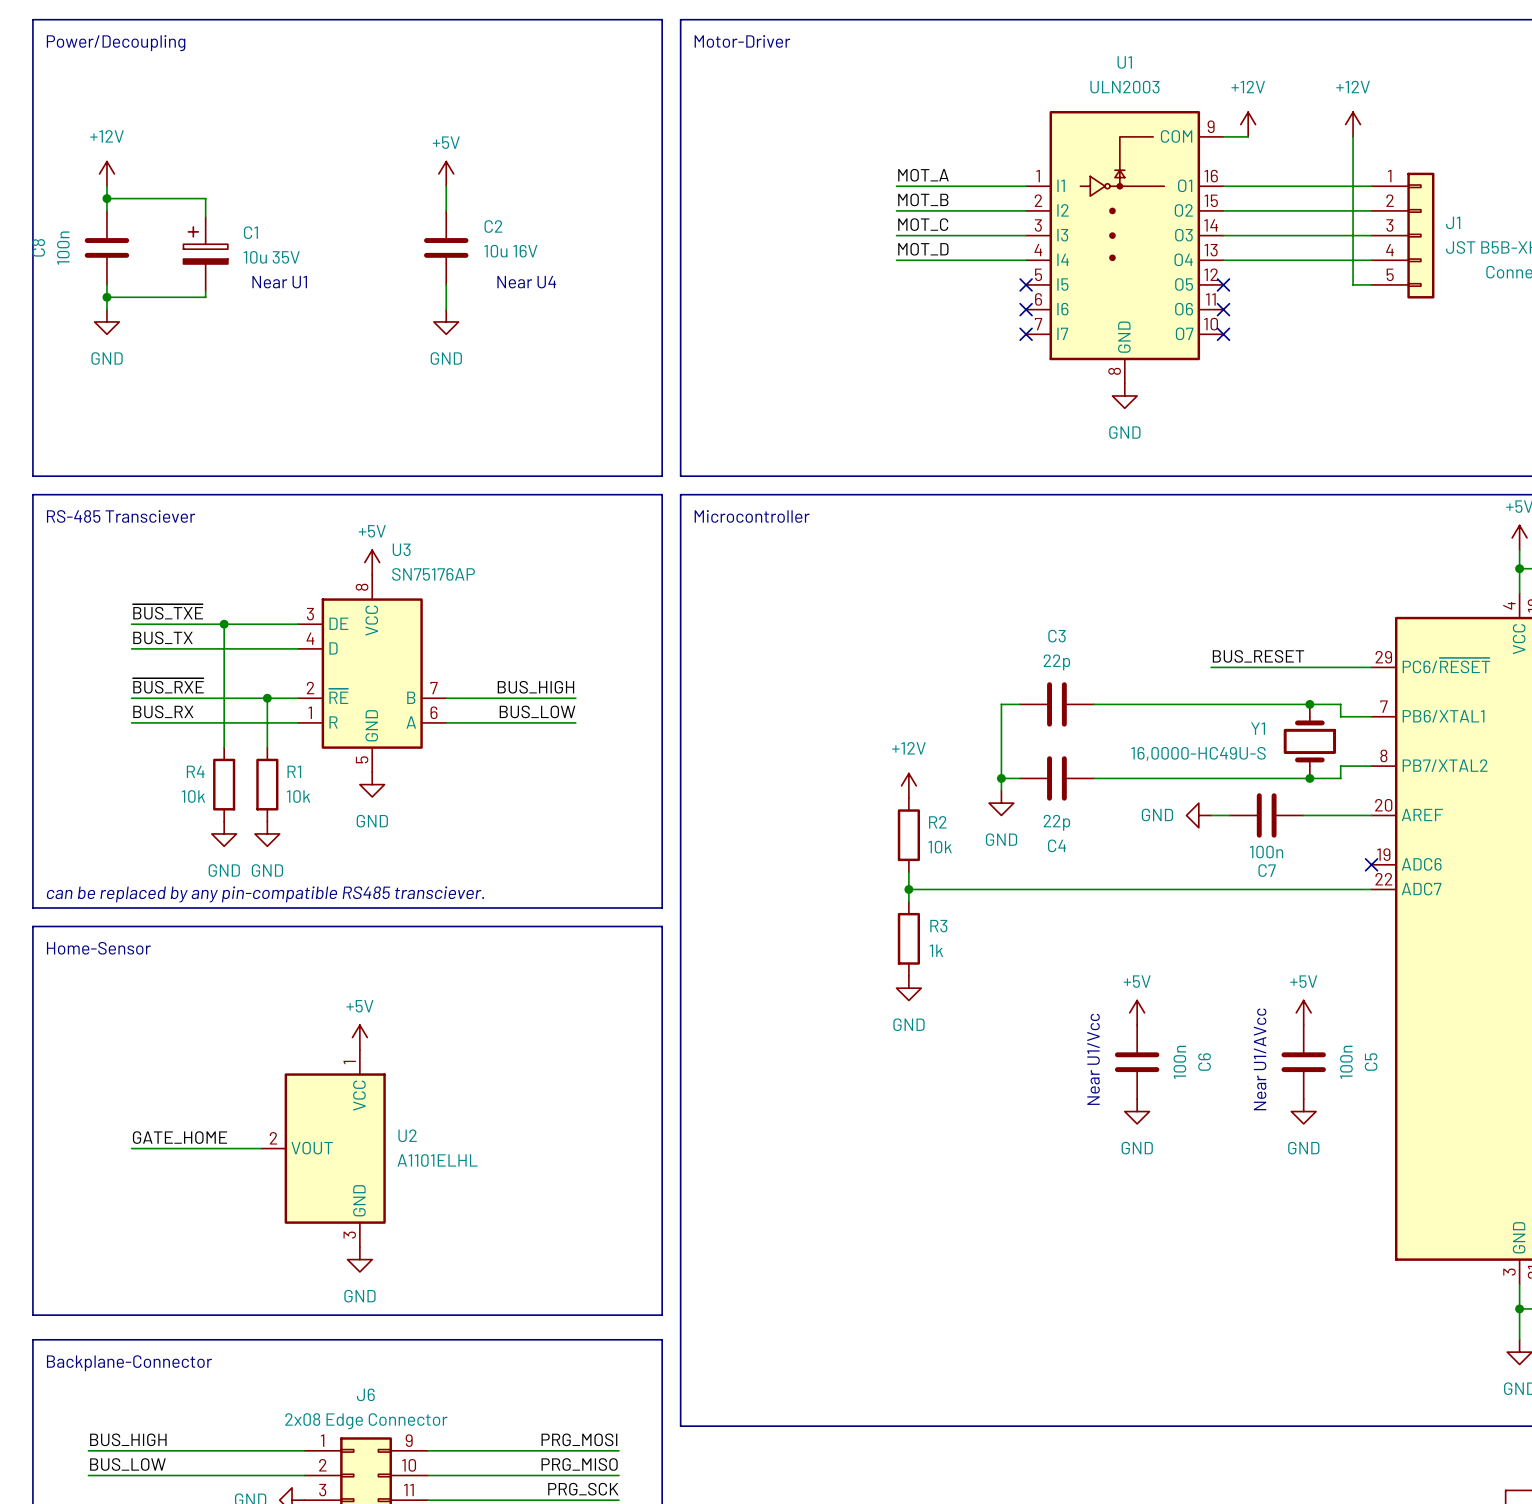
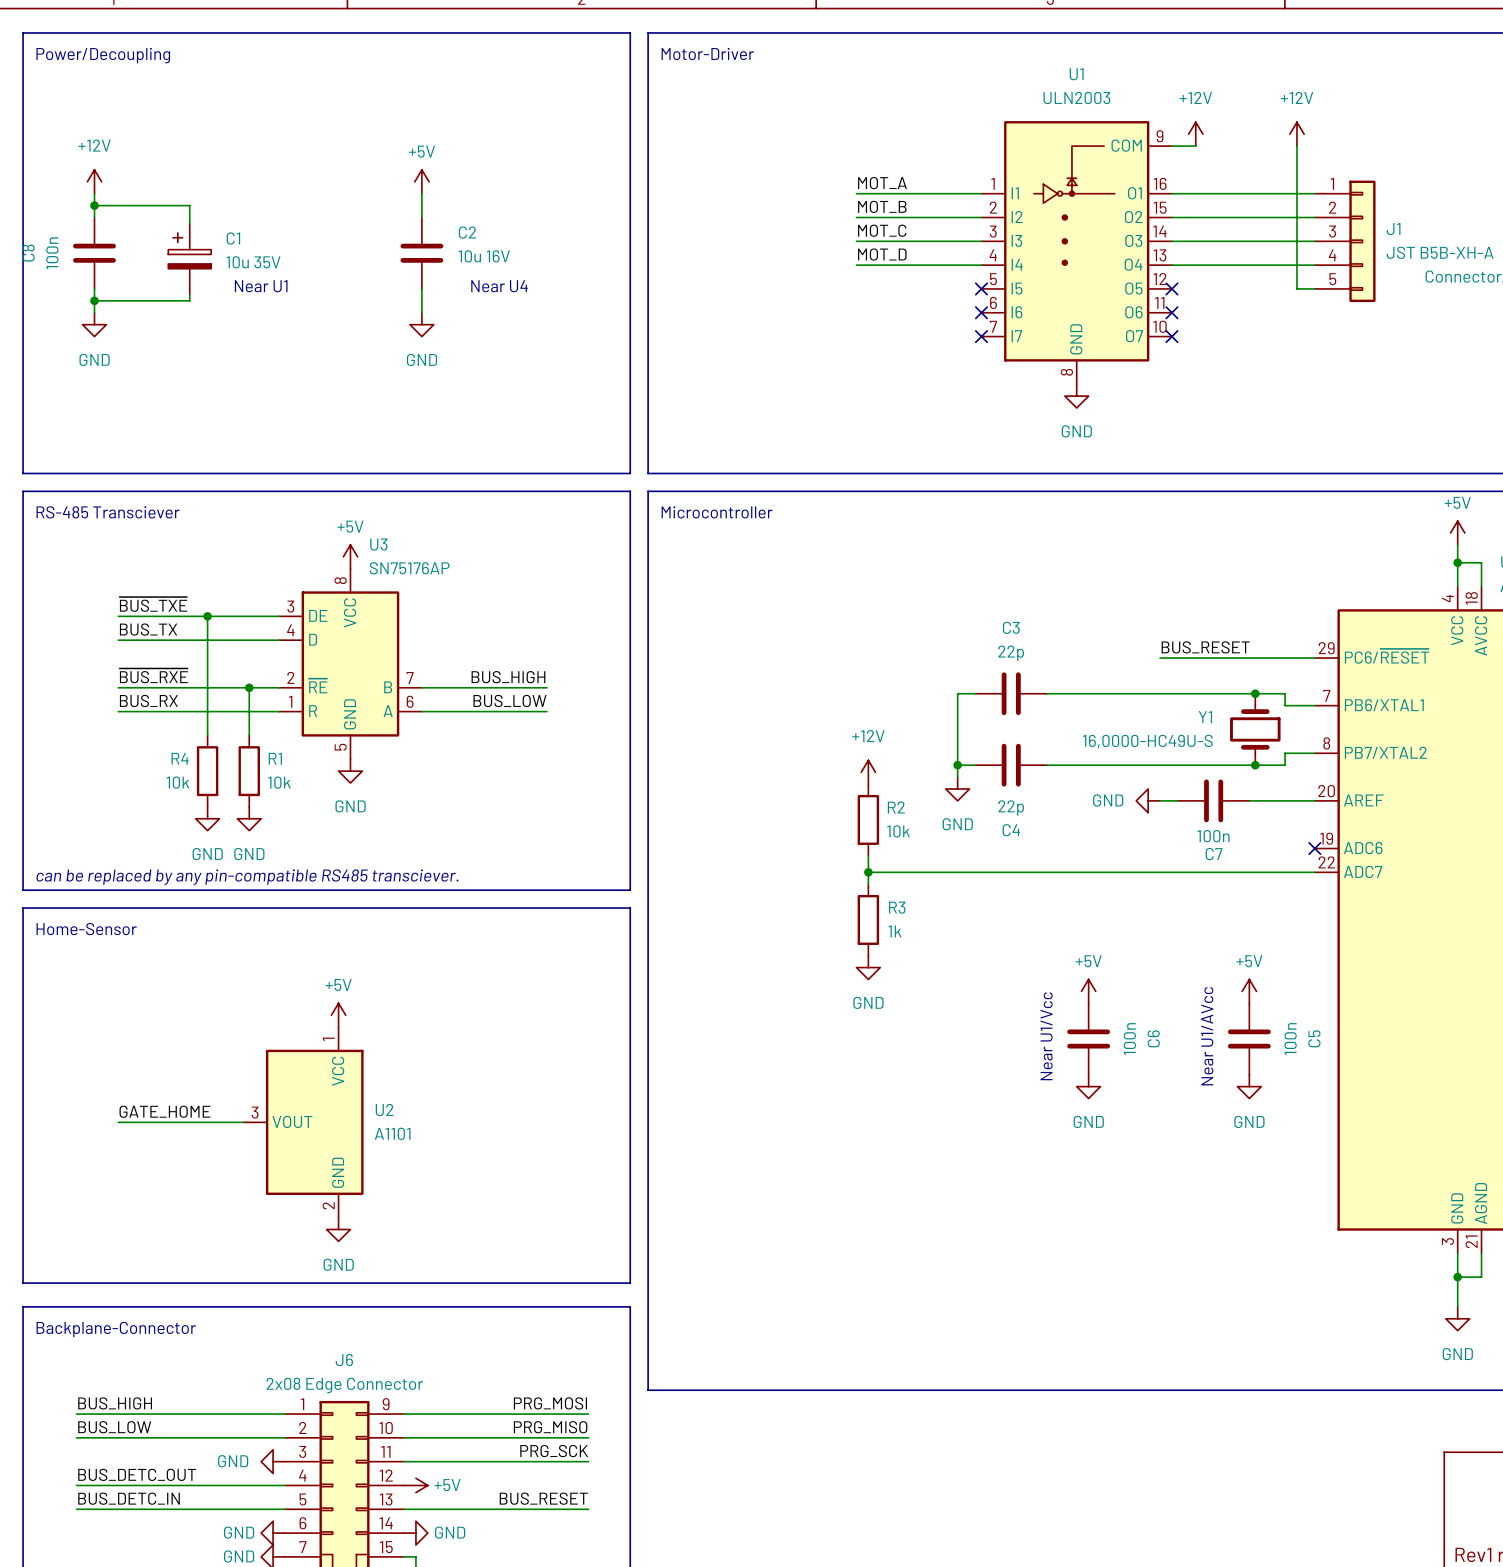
U2 pin number: 2 (273, 1138) -> 3 (255, 1112)
U2 value: A1101ELHL (437, 1160) -> A1101 (392, 1133)
U2 pin number: 3 (349, 1235) -> 2 (328, 1205)

